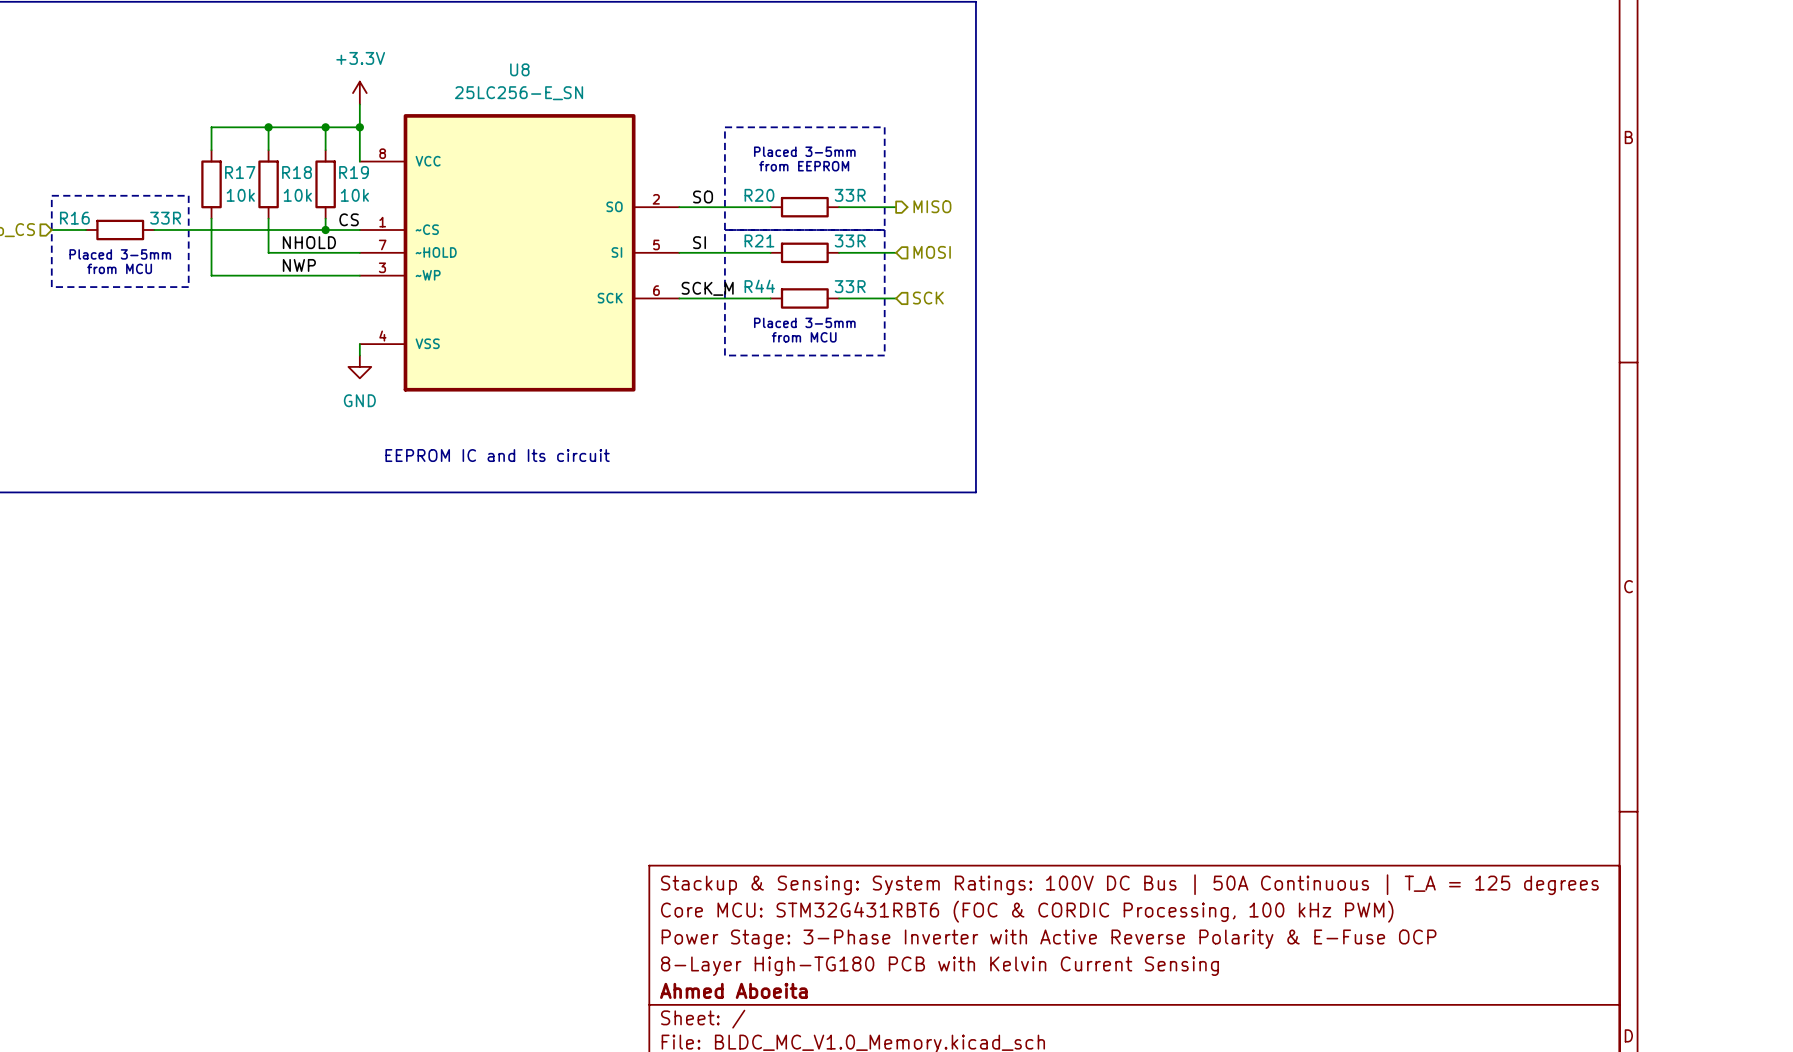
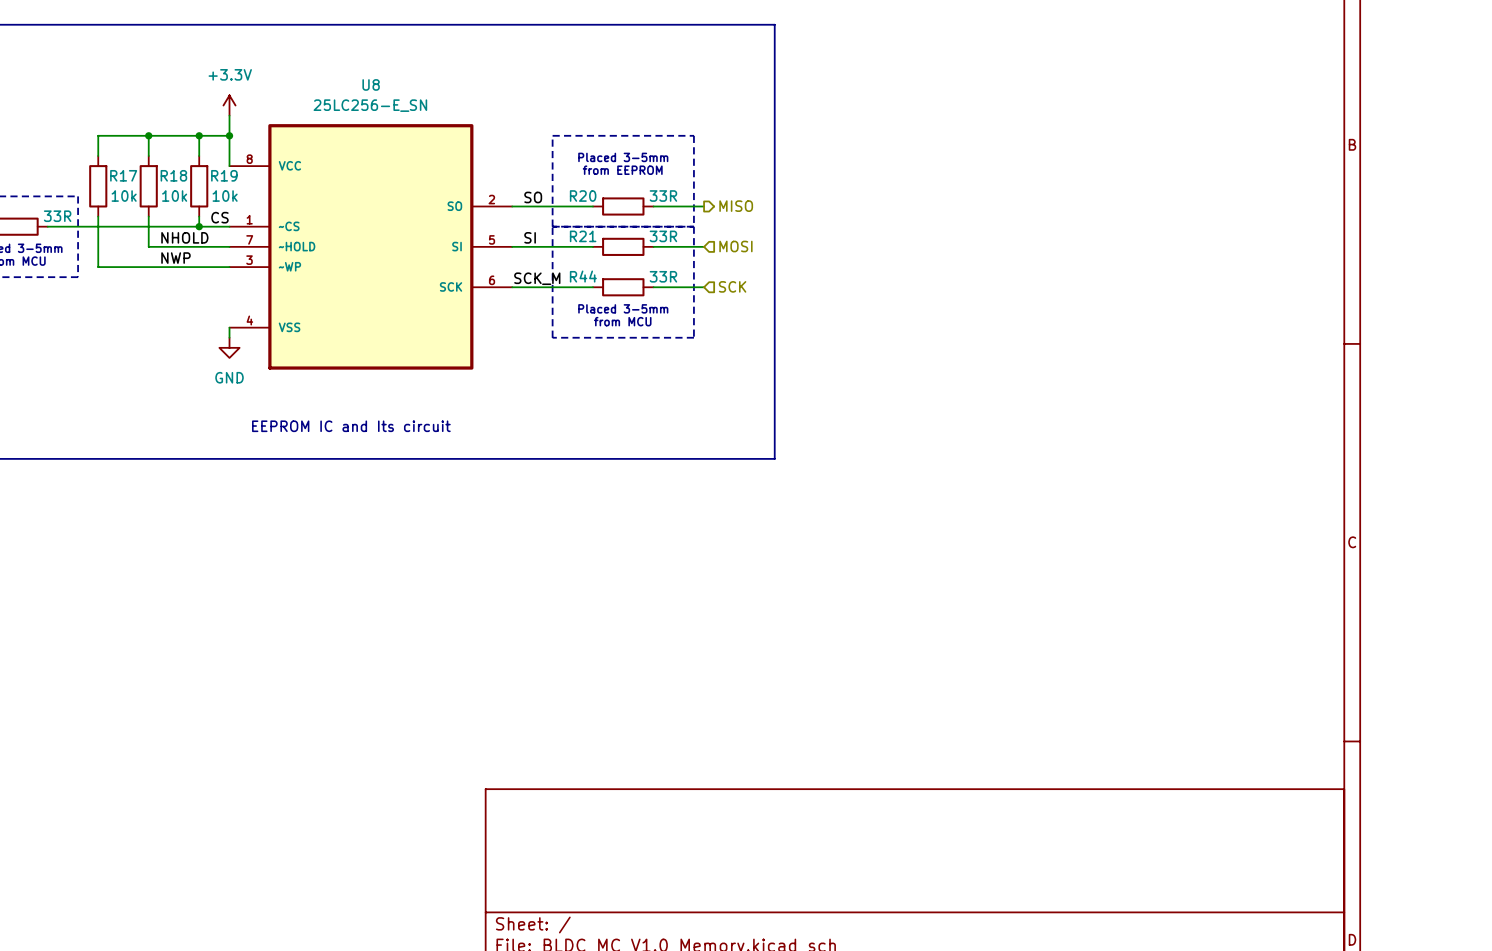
title block: Stackup & Sensing: System Ratings: 100V DC Bus | 50A Continuous | T_A = 125 degrees (1129, 884) -> none
title block: Core MCU: STM32G431RBT6 (FOC & CORDIC Processing, 100 kHz PWM) (1027, 911) -> none
title block: Power Stage: 3-Phase Inverter with Active Reverse Polarity & E-Fuse OCP (1049, 939) -> none
title block: 8-Layer High-TG180 PCB with Kelvin Current Sensing (939, 966) -> none
title block: Ahmed Aboeita (733, 990) -> none

